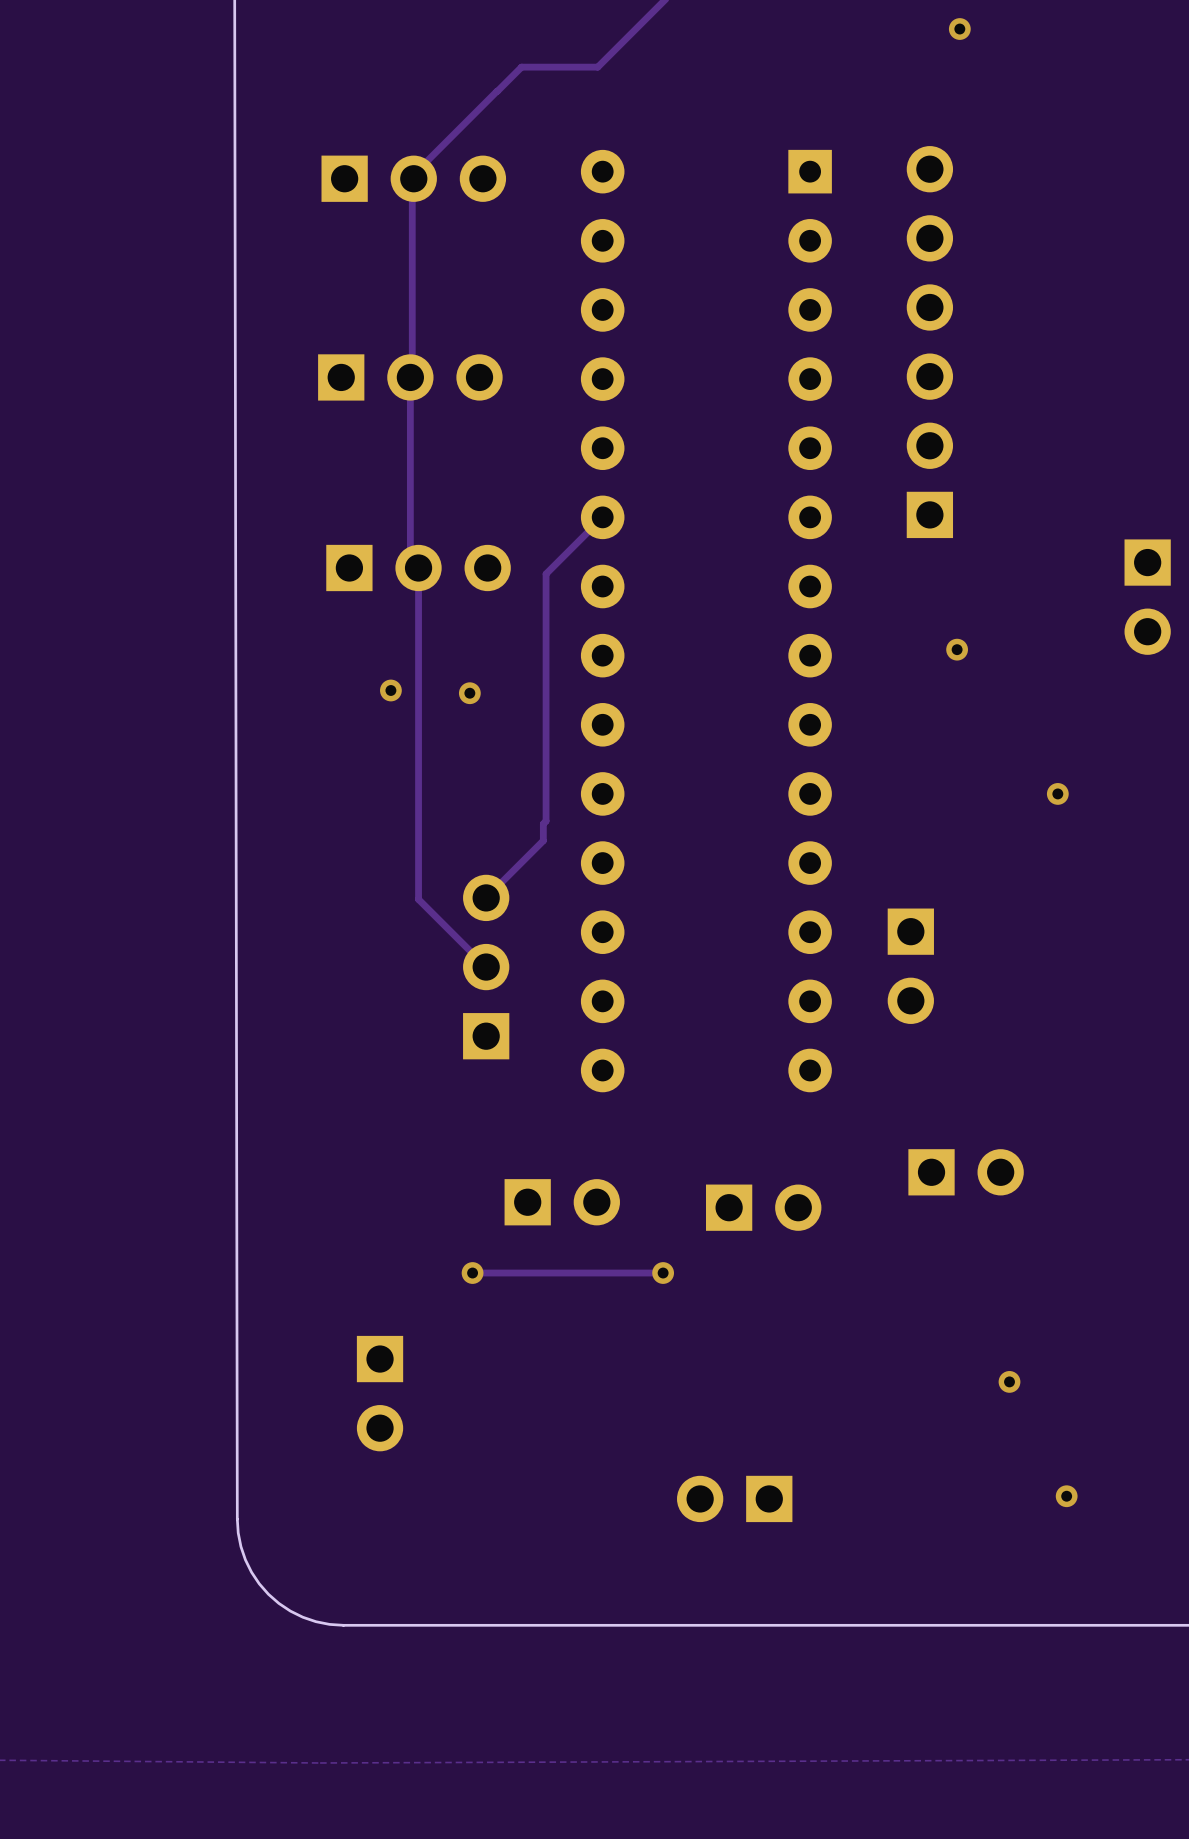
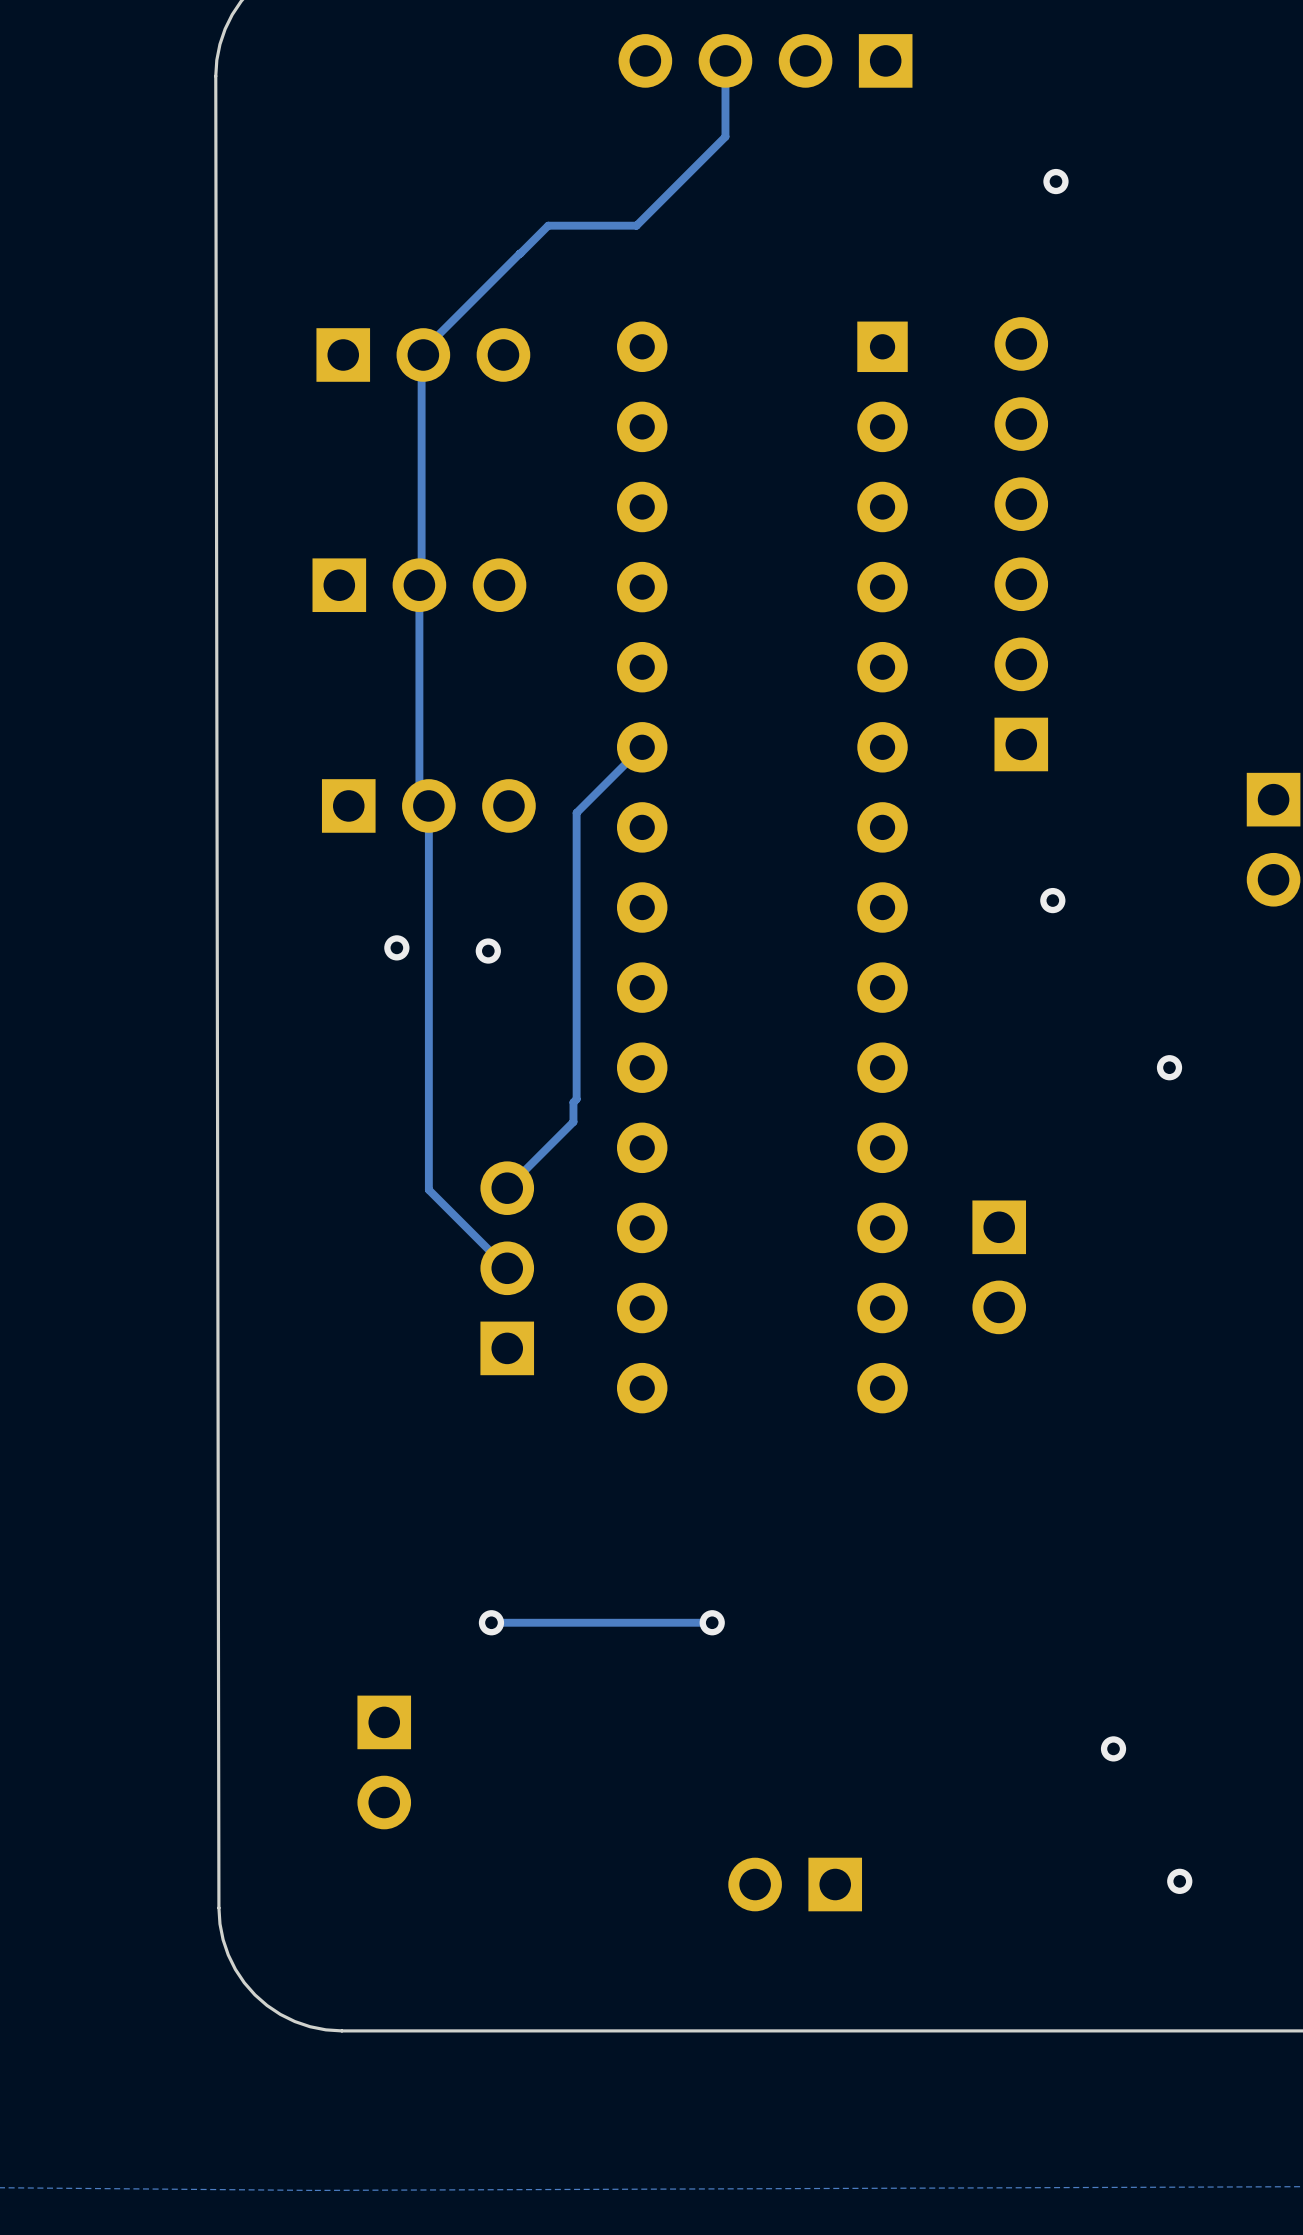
part: (966, 1172) -> none
part: (562, 1202) -> none
part: (763, 1207) -> none

